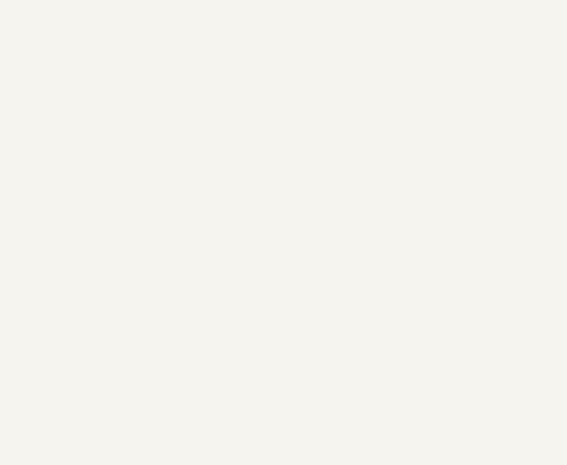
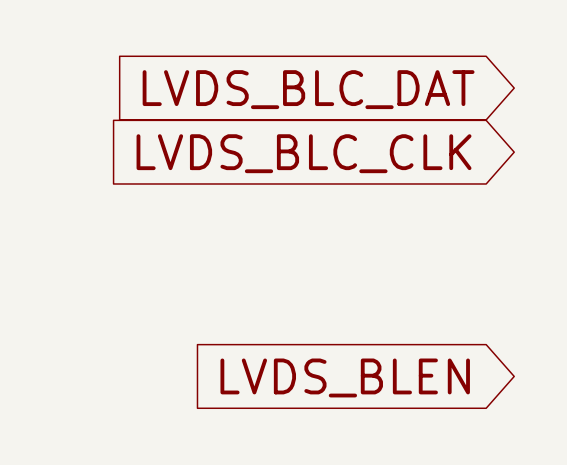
global label: none -> LVDS_BLC_DAT (308, 89)
global label: none -> LVDS_BLC_CLK (304, 153)
global label: none -> LVDS_BLEN (345, 377)

